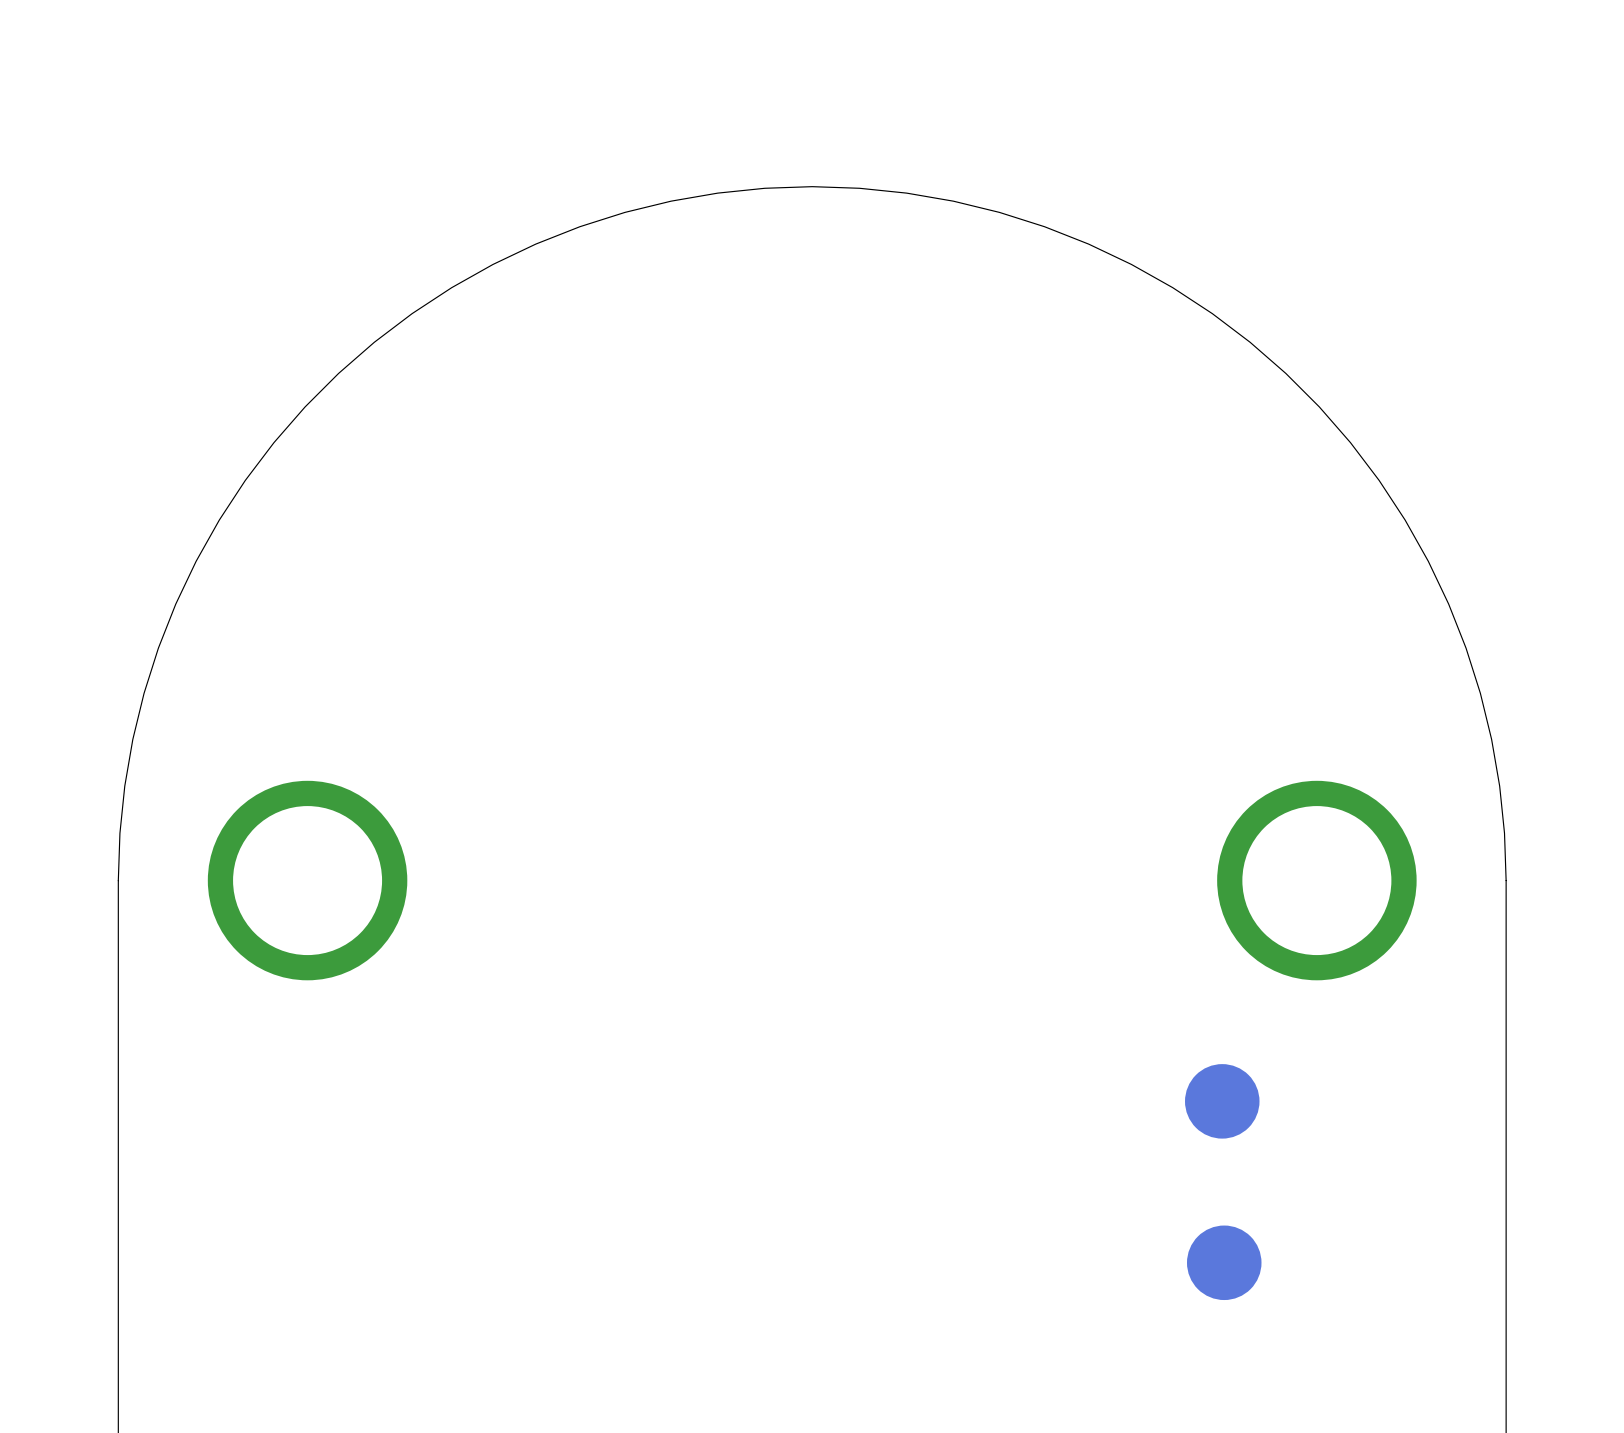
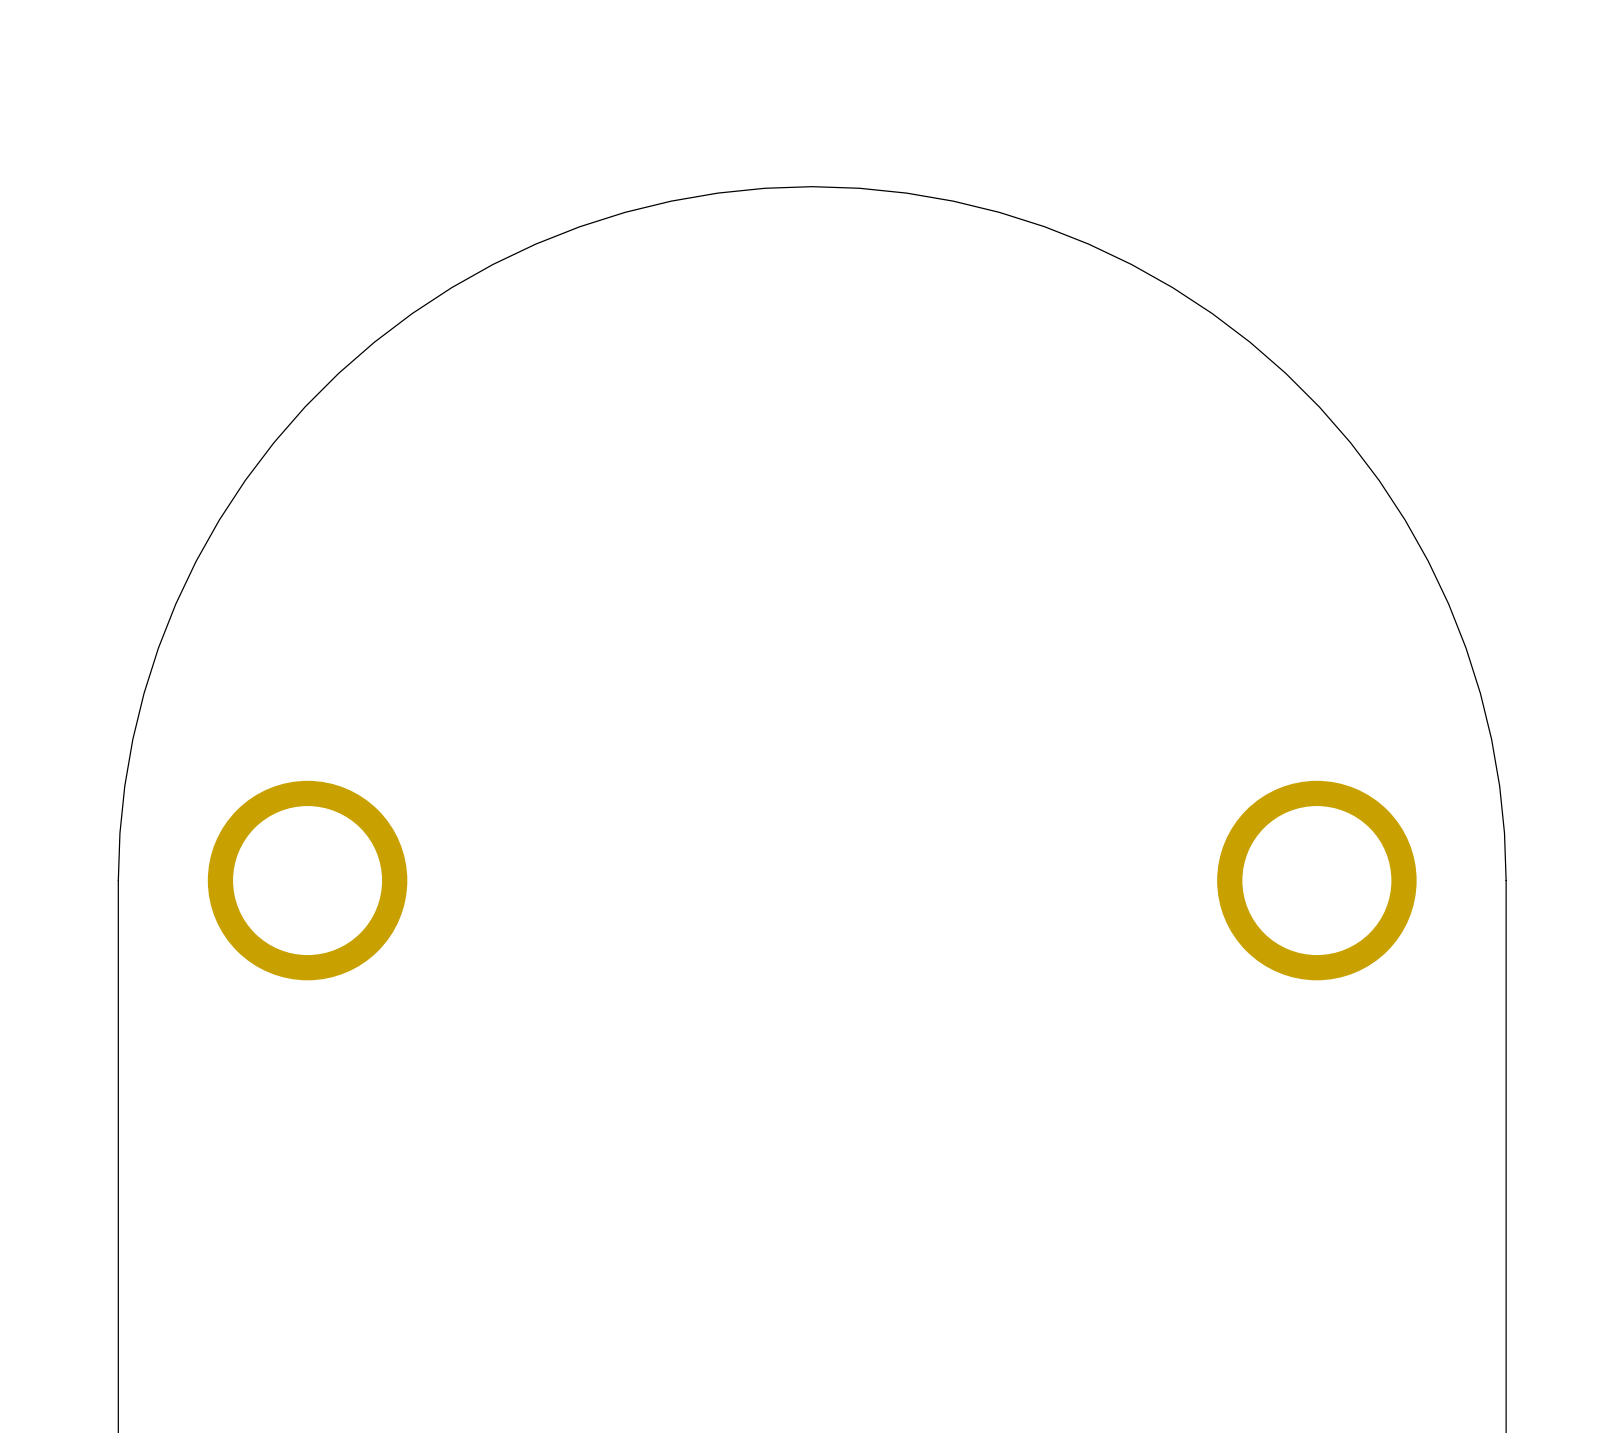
part: (1222, 1101) -> none
part: (1224, 1262) -> none

